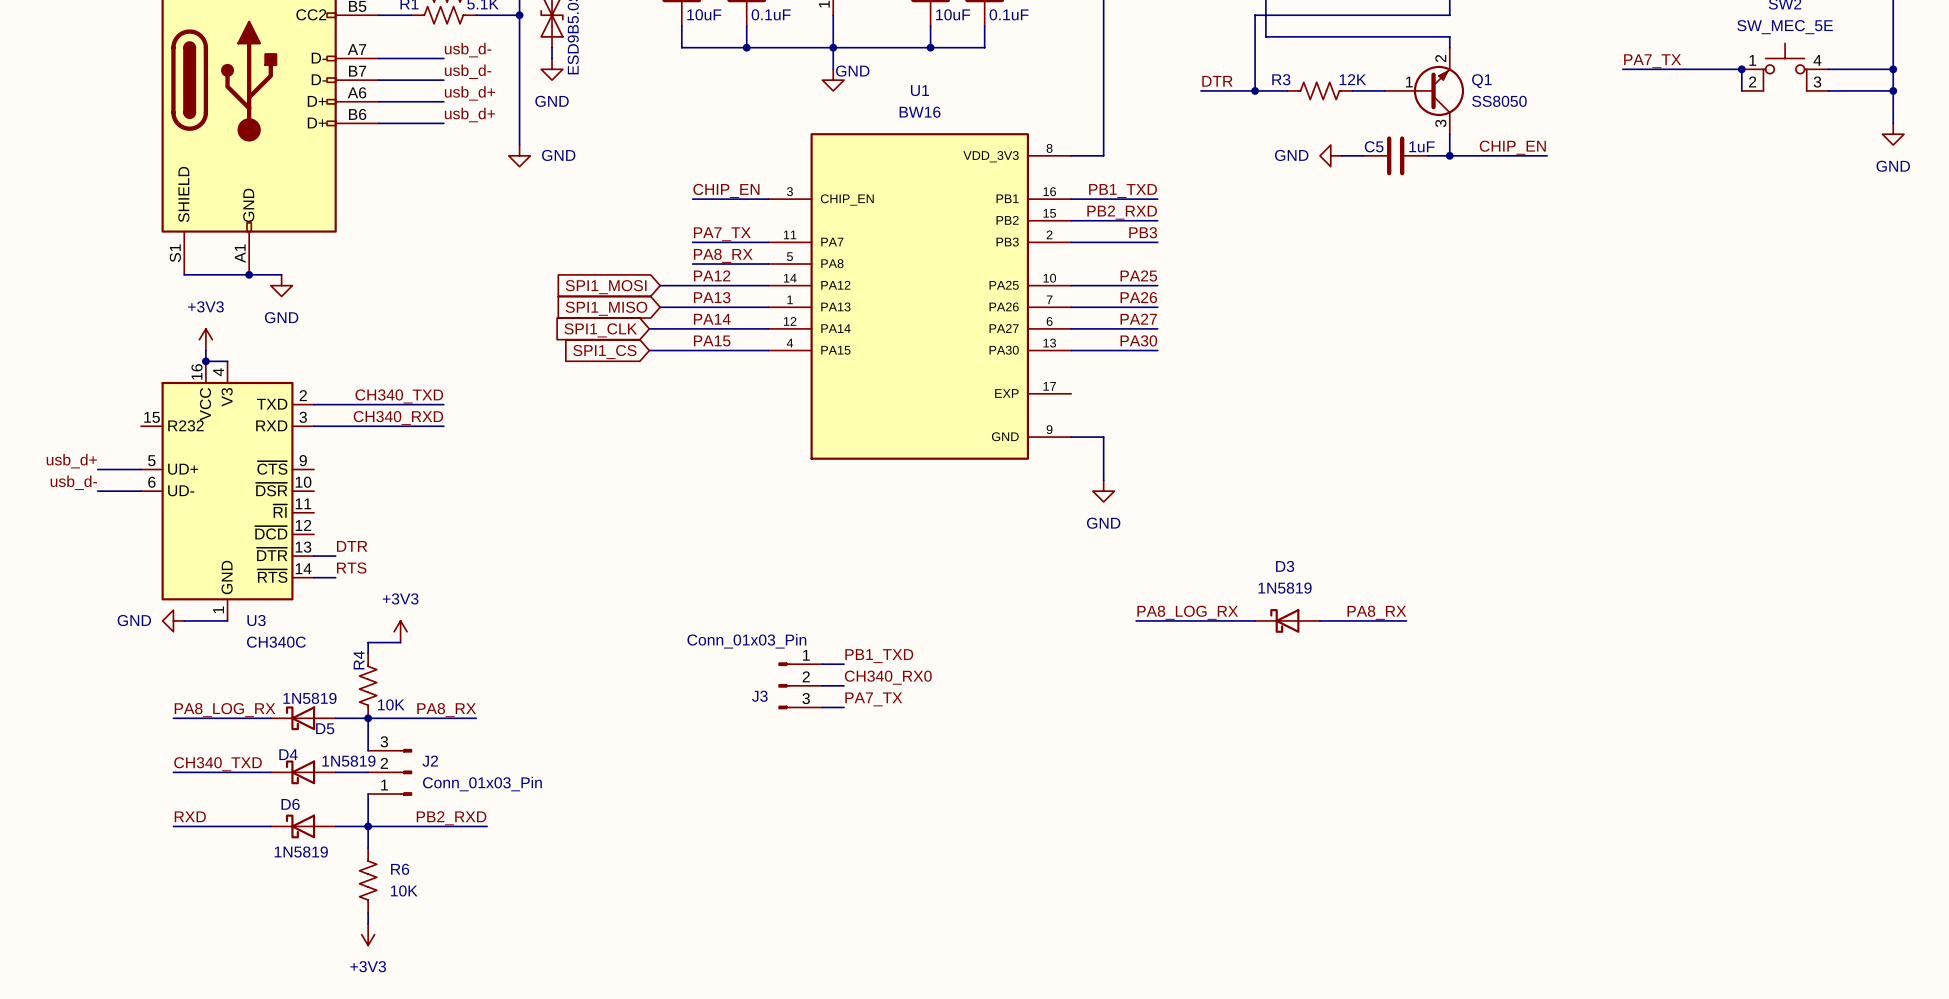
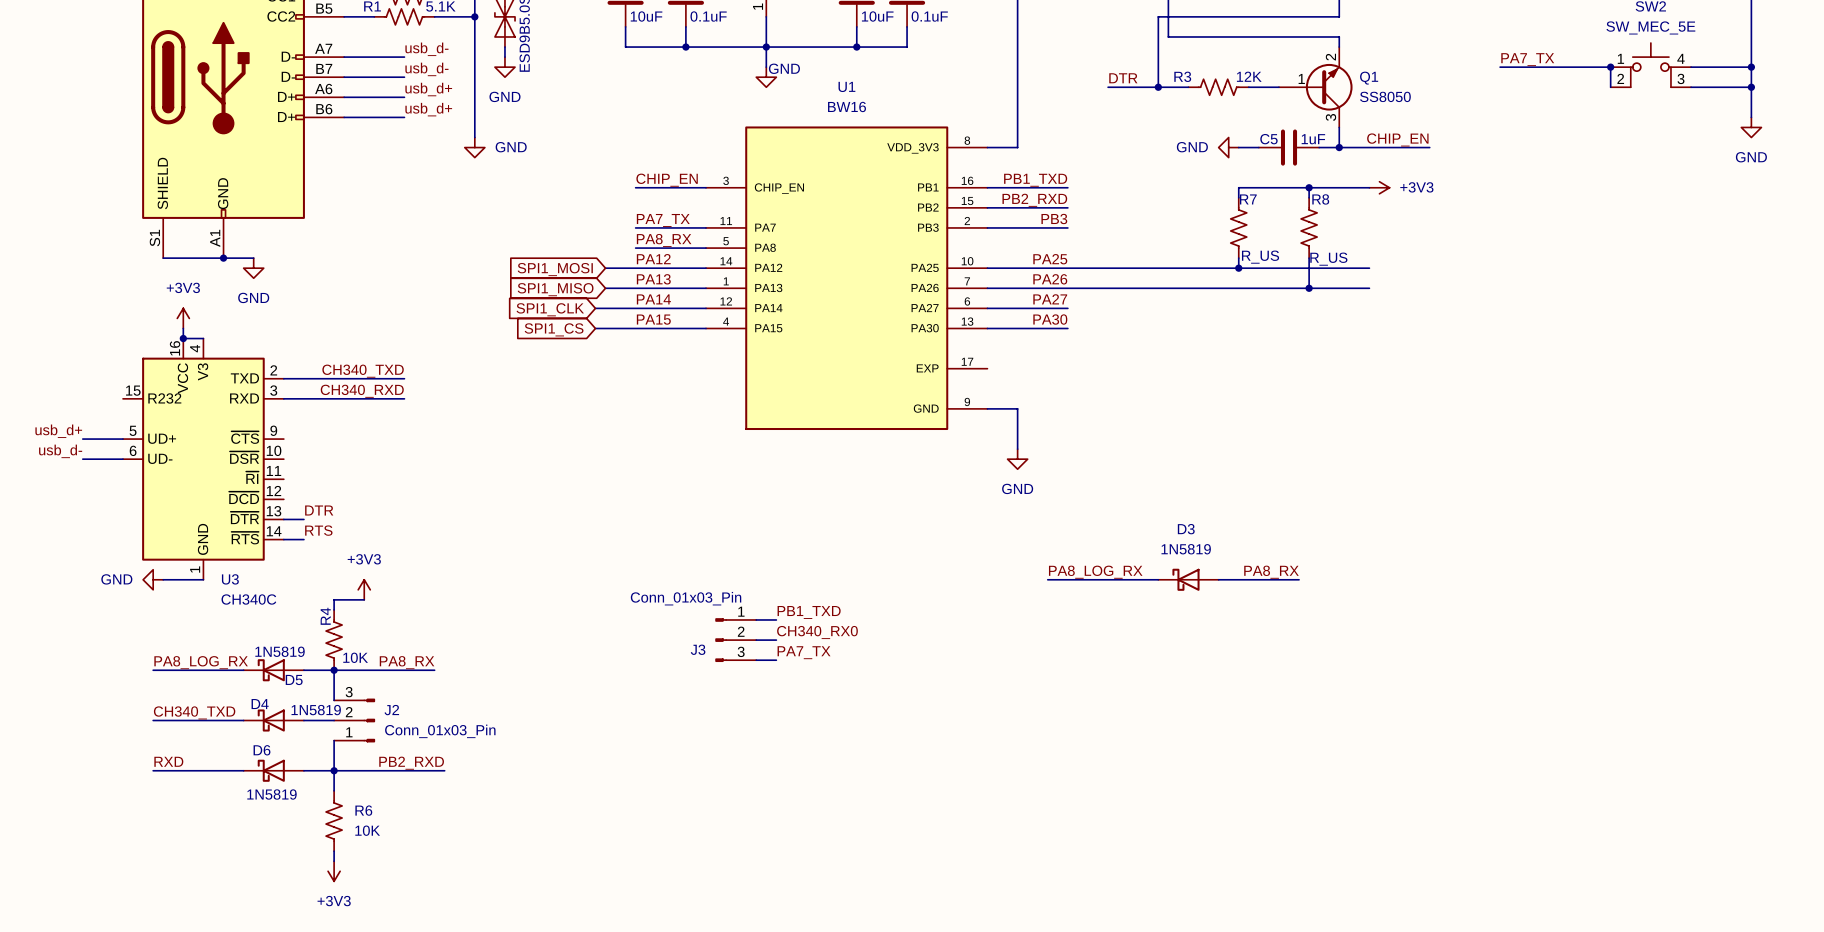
wire: none -> (1309, 187) (1309, 197)
junction: none -> (1309, 187)
wire: none -> (1369, 187) (1238, 187) (1238, 197)
power symbol: none -> +3V3 (1379, 187)
R7: none -> R_US (1238, 227)
R8: none -> R_US (1309, 227)
wire: none -> (1238, 258) (1238, 268)
wire: none -> (1309, 258) (1309, 288)
wire: none -> (1067, 268) (1369, 268)
junction: none -> (1238, 268)
wire: none -> (1067, 288) (1369, 288)
junction: none -> (1309, 288)

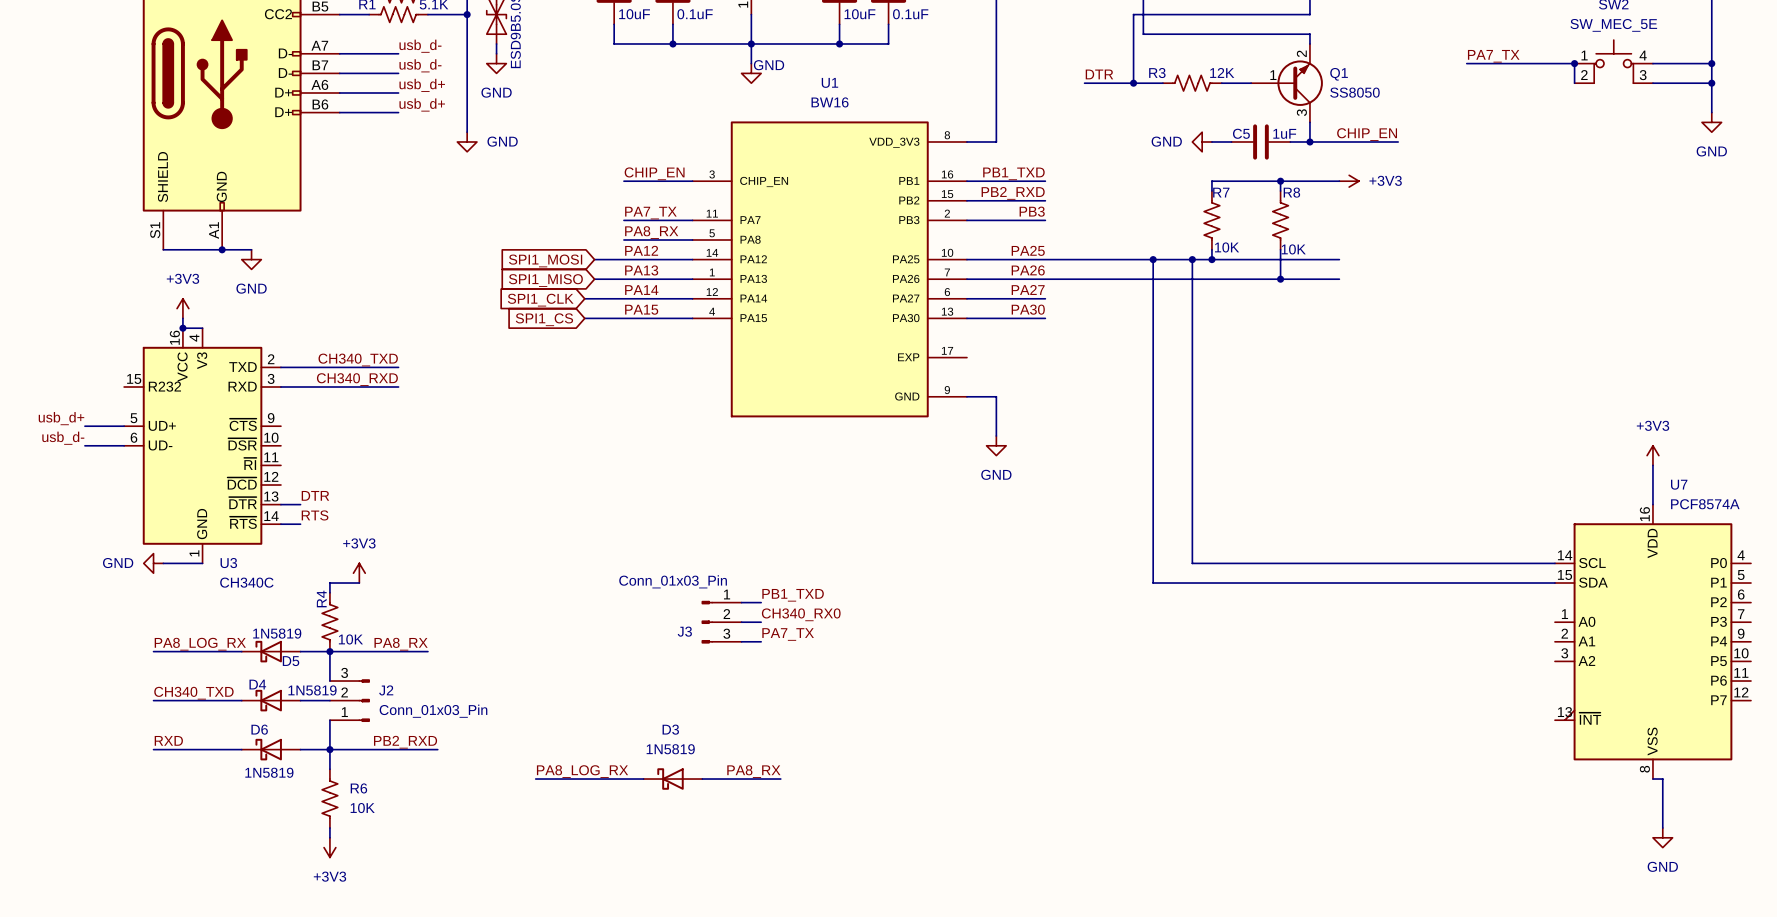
R7 value: R_US (1260, 257) -> 10K (1227, 247)
R8 value: R_US (1328, 259) -> 10K (1293, 249)
wire: none -> (1153, 259) (1153, 583) (1554, 583)
junction: none -> (1153, 259)
wire: none -> (1192, 259) (1192, 563)
junction: none -> (1192, 259)
power symbol: none -> +3V3 (1652, 455)
wire: none -> (1652, 465) (1652, 504)
label: PA8_LOG_RX (1095, 572) -> none
label: PA8_RX (1271, 572) -> none
wire: (1047, 579) (1158, 579) -> none
D3 position: (1188, 579) -> (672, 779)
wire: none -> (1270, 563) (1554, 563)
U7: none -> PCF8574A (1652, 641)
label: none -> PA8_LOG_RX (582, 771)
label: none -> PA8_RX (753, 771)
wire: none -> (535, 779) (643, 779)
wire: none -> (702, 779) (780, 779)
wire: none -> (1652, 779) (1662, 779) (1662, 828)
power symbol: none -> GND (1662, 837)

